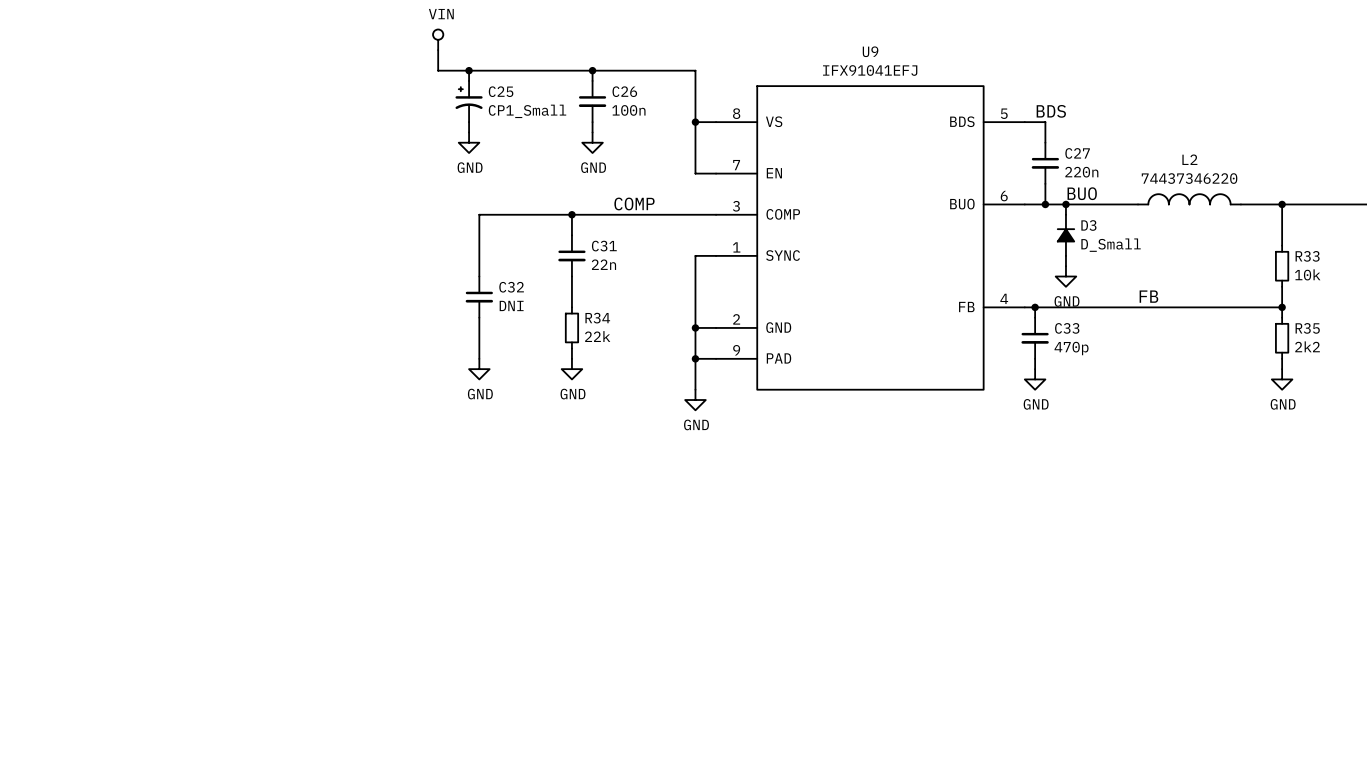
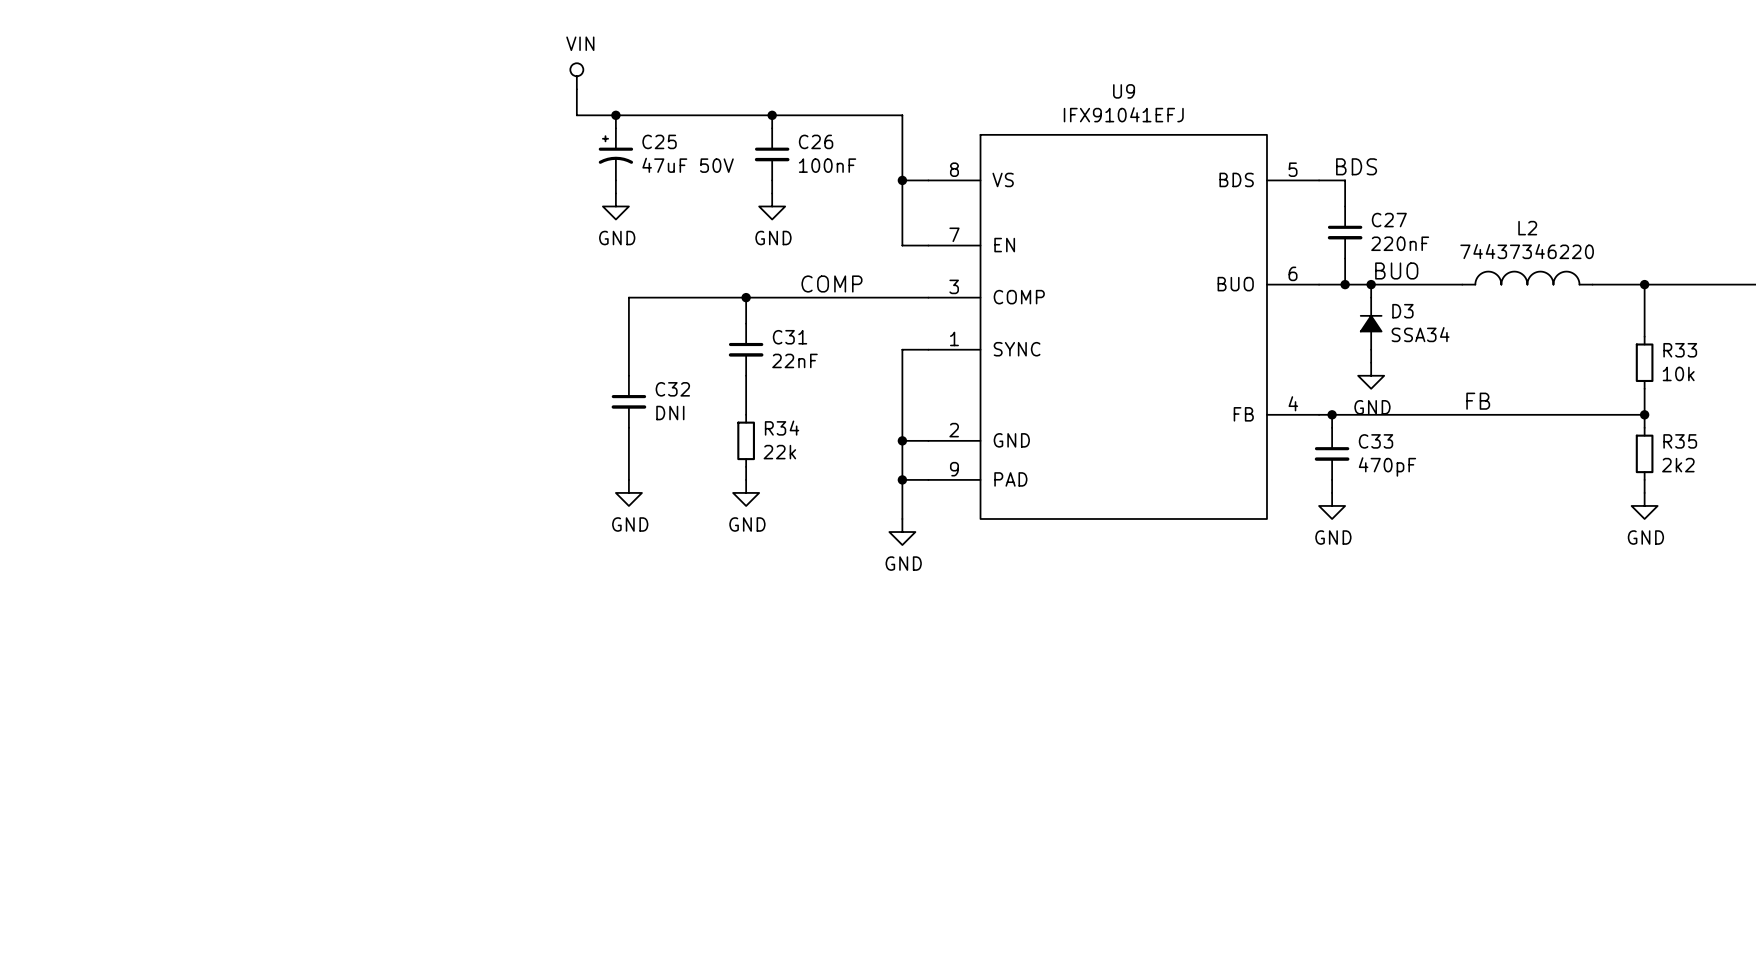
C26 value: 100n (628, 110) -> 100nF (827, 165)
C25 value: CP1_Small (527, 111) -> 47uF 50V (688, 165)
C27 value: 220n (1081, 172) -> 220nF (1400, 243)
D3 value: D_Small (1111, 245) -> SSA34 (1420, 334)
C31 value: 22n (603, 264) -> 22nF (794, 360)
C33 value: 470p (1071, 348) -> 470pF (1387, 466)

